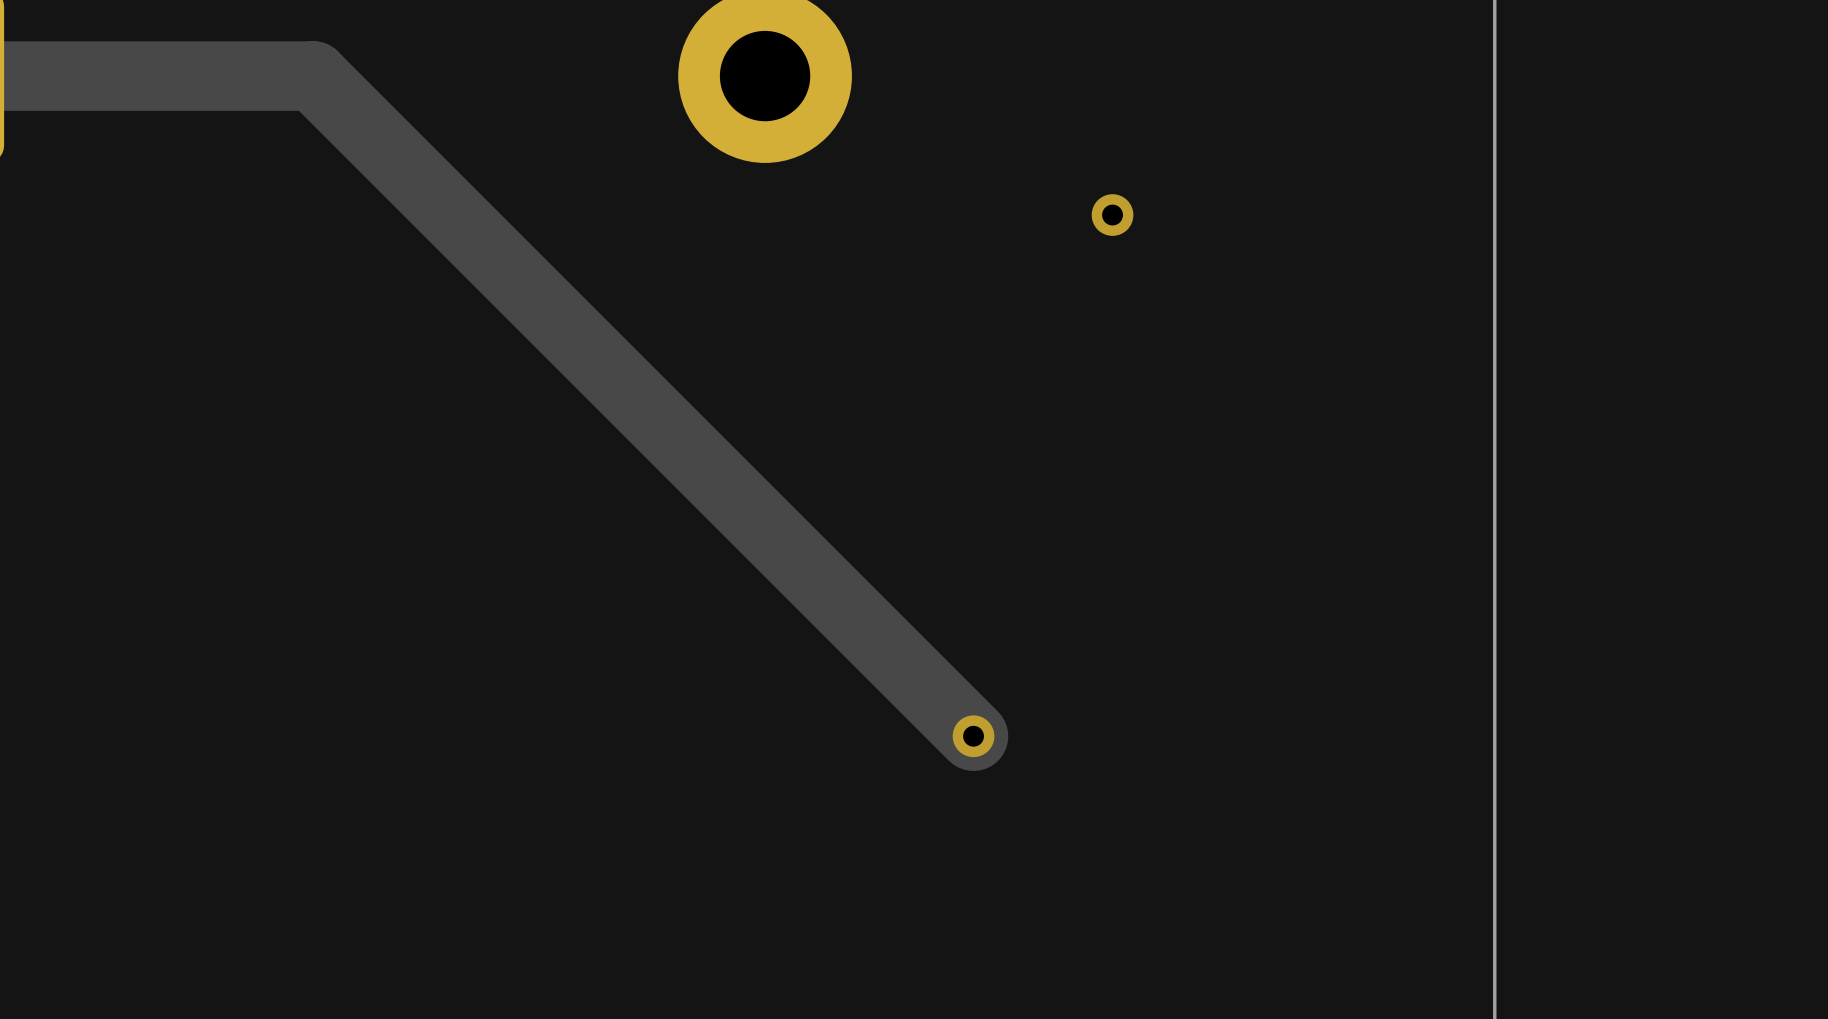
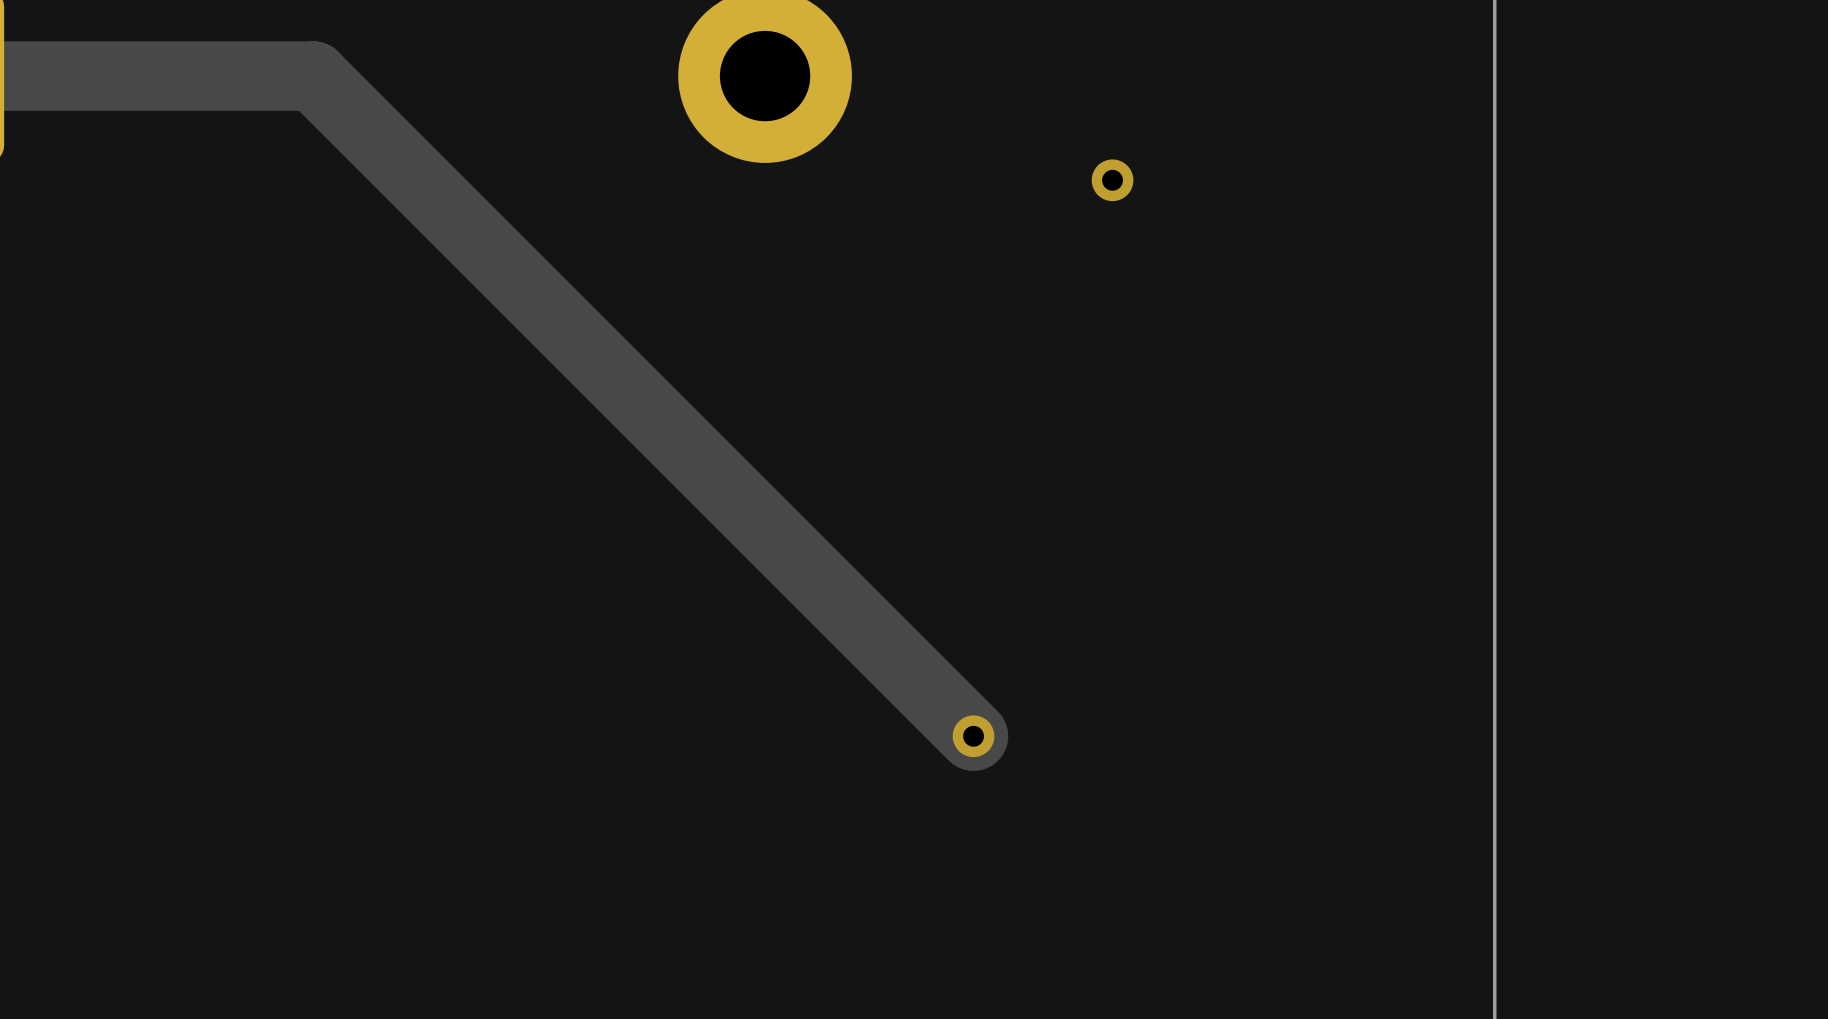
via position: (1112, 215) -> (1112, 180)

